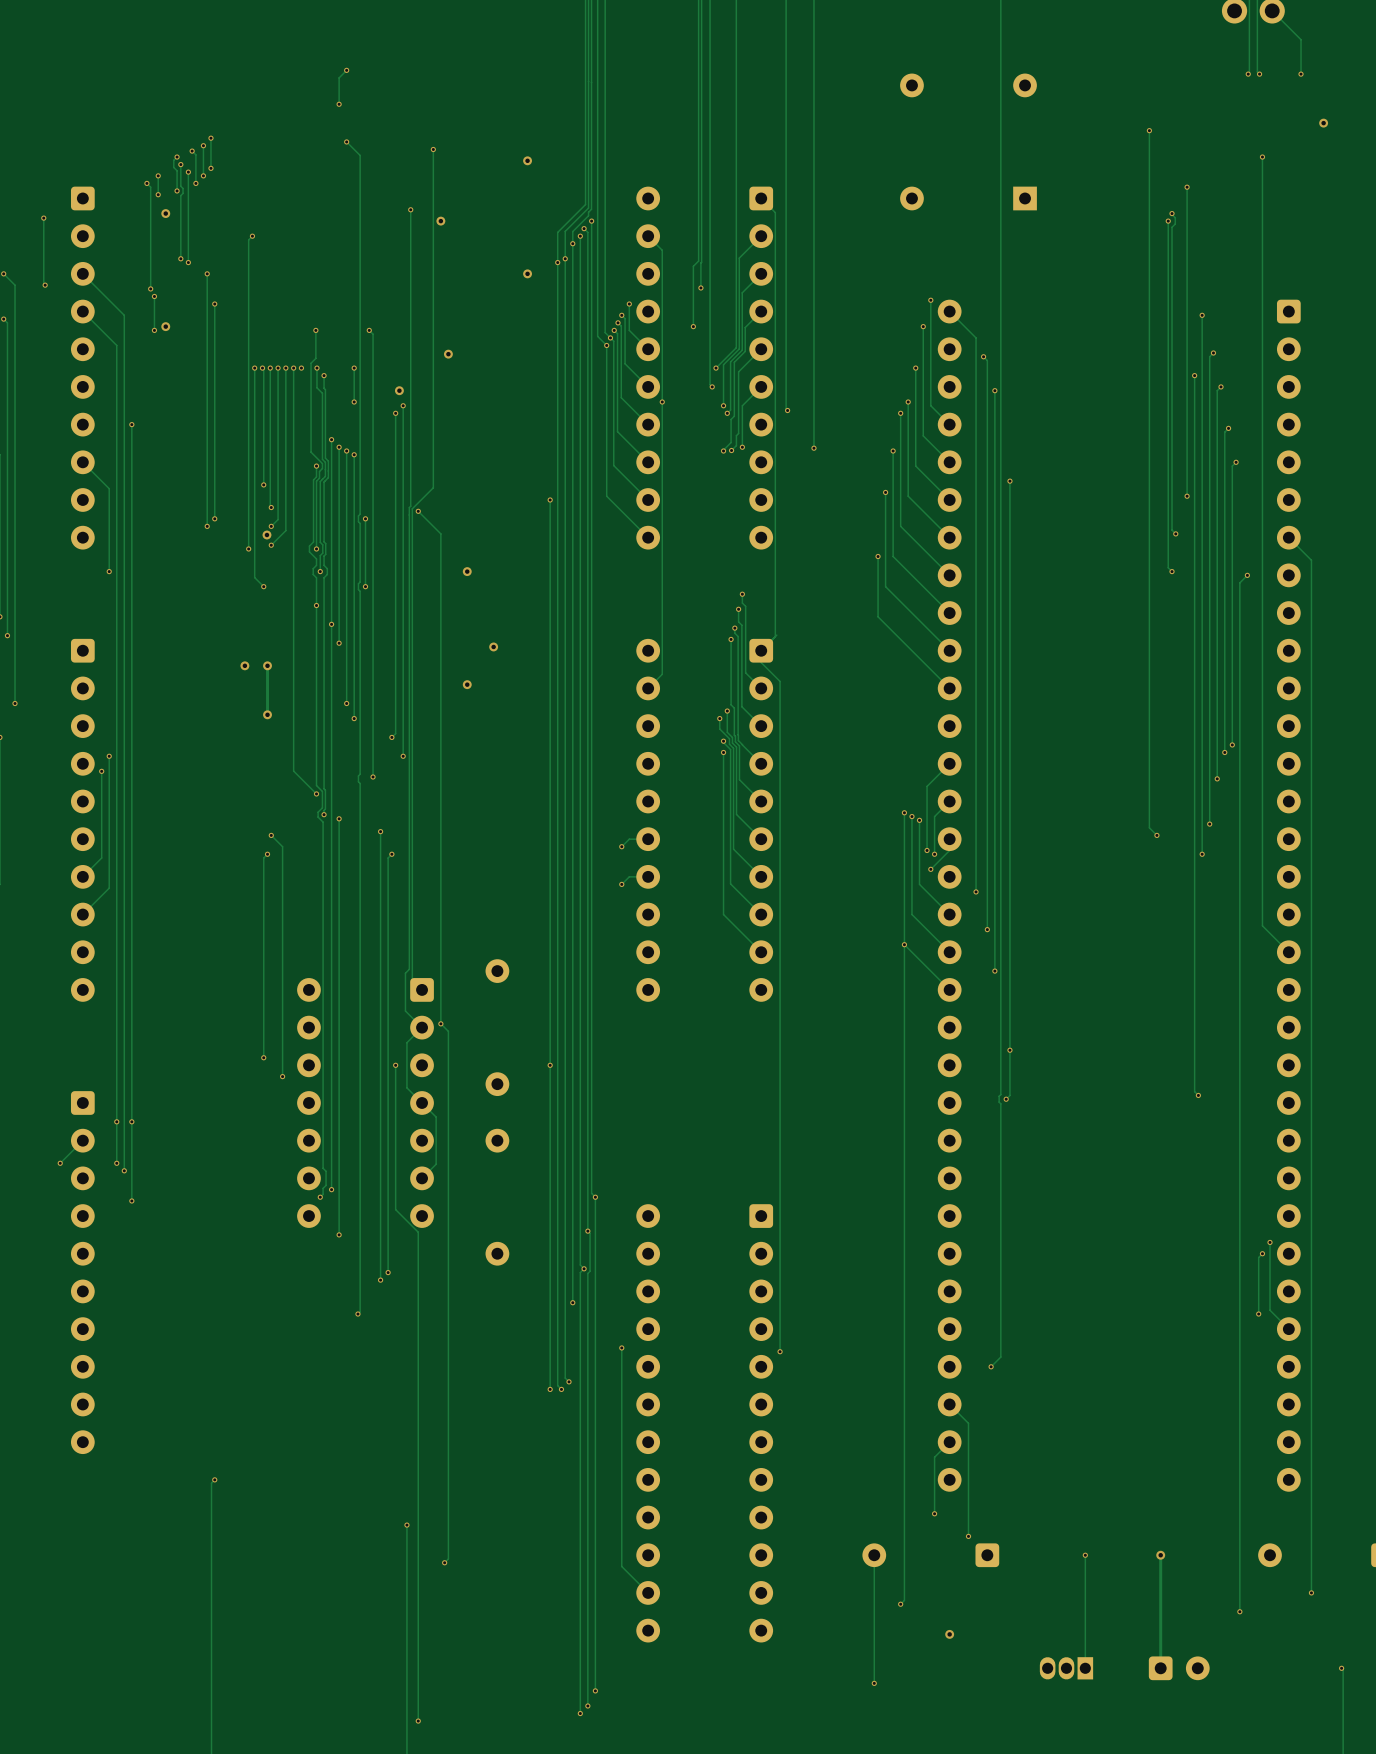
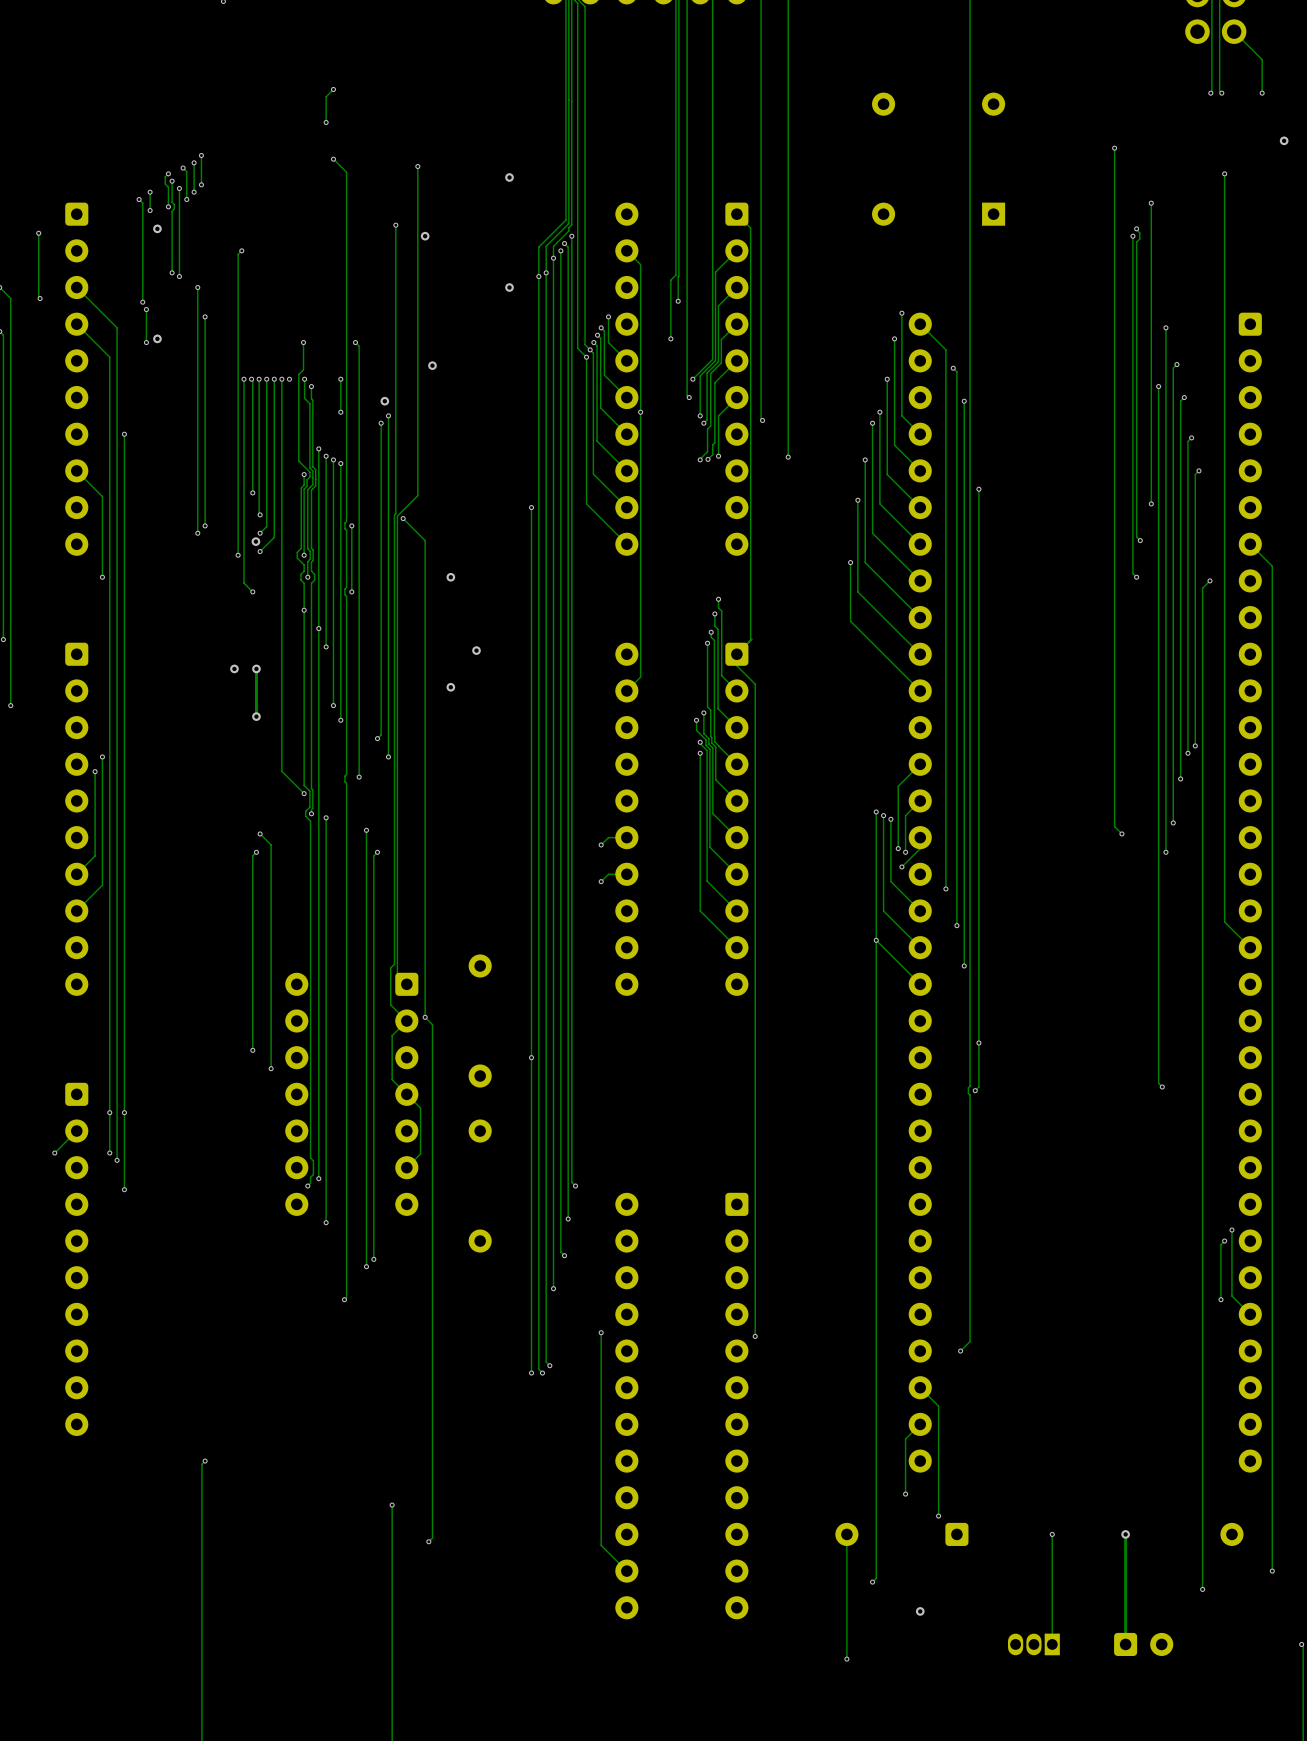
track: (395, 1065) (395, 1209) (418, 1232) (418, 1721) -> none
via: (395, 1065) -> none
track: (595, 1197) (595, 1690) -> none
track: (587, 1231) (590, 1233) (590, 1271) (587, 1273) (587, 1705) -> none
track: (584, 1268) (580, 1272) (580, 1713) -> none
via: (595, 1690) -> none
via: (587, 1705) -> none
via: (580, 1713) -> none
via: (418, 1721) -> none

